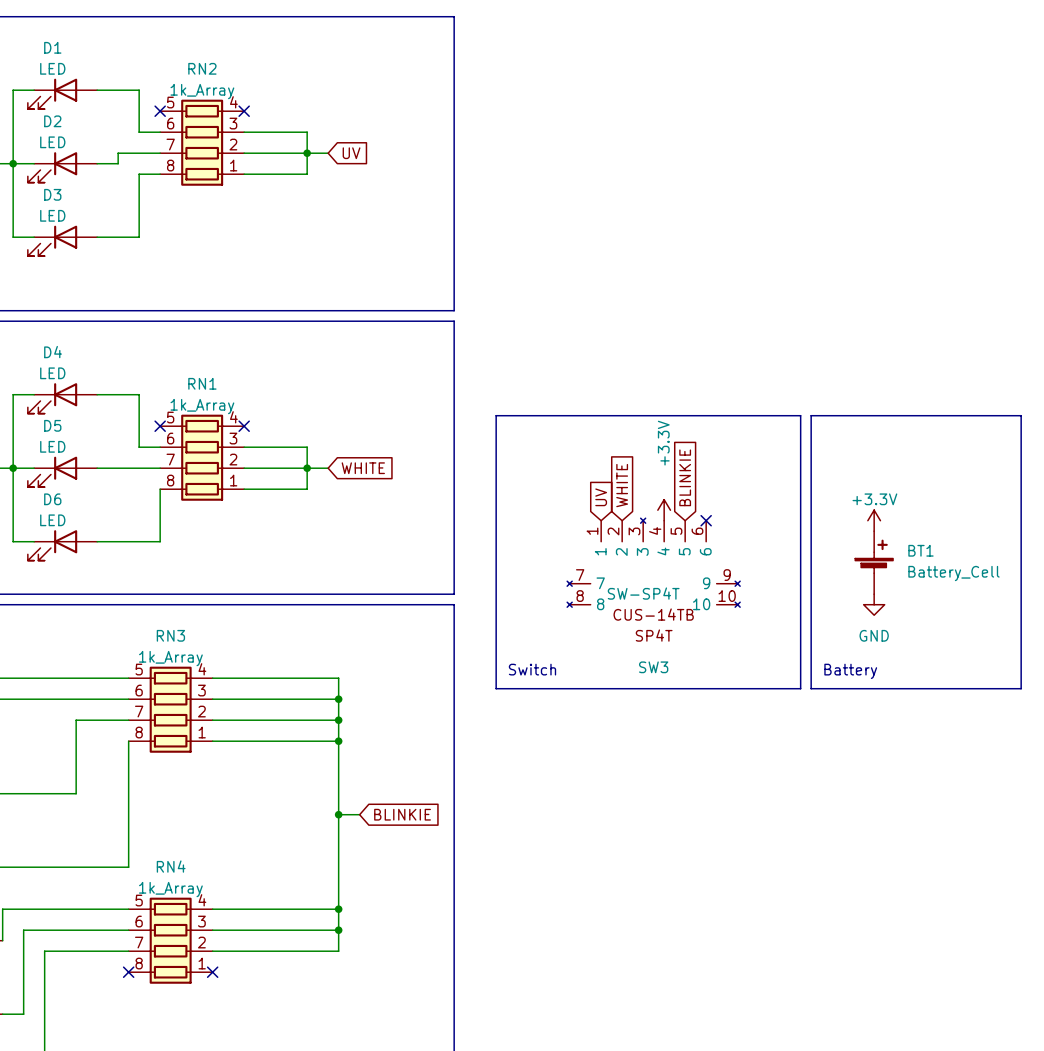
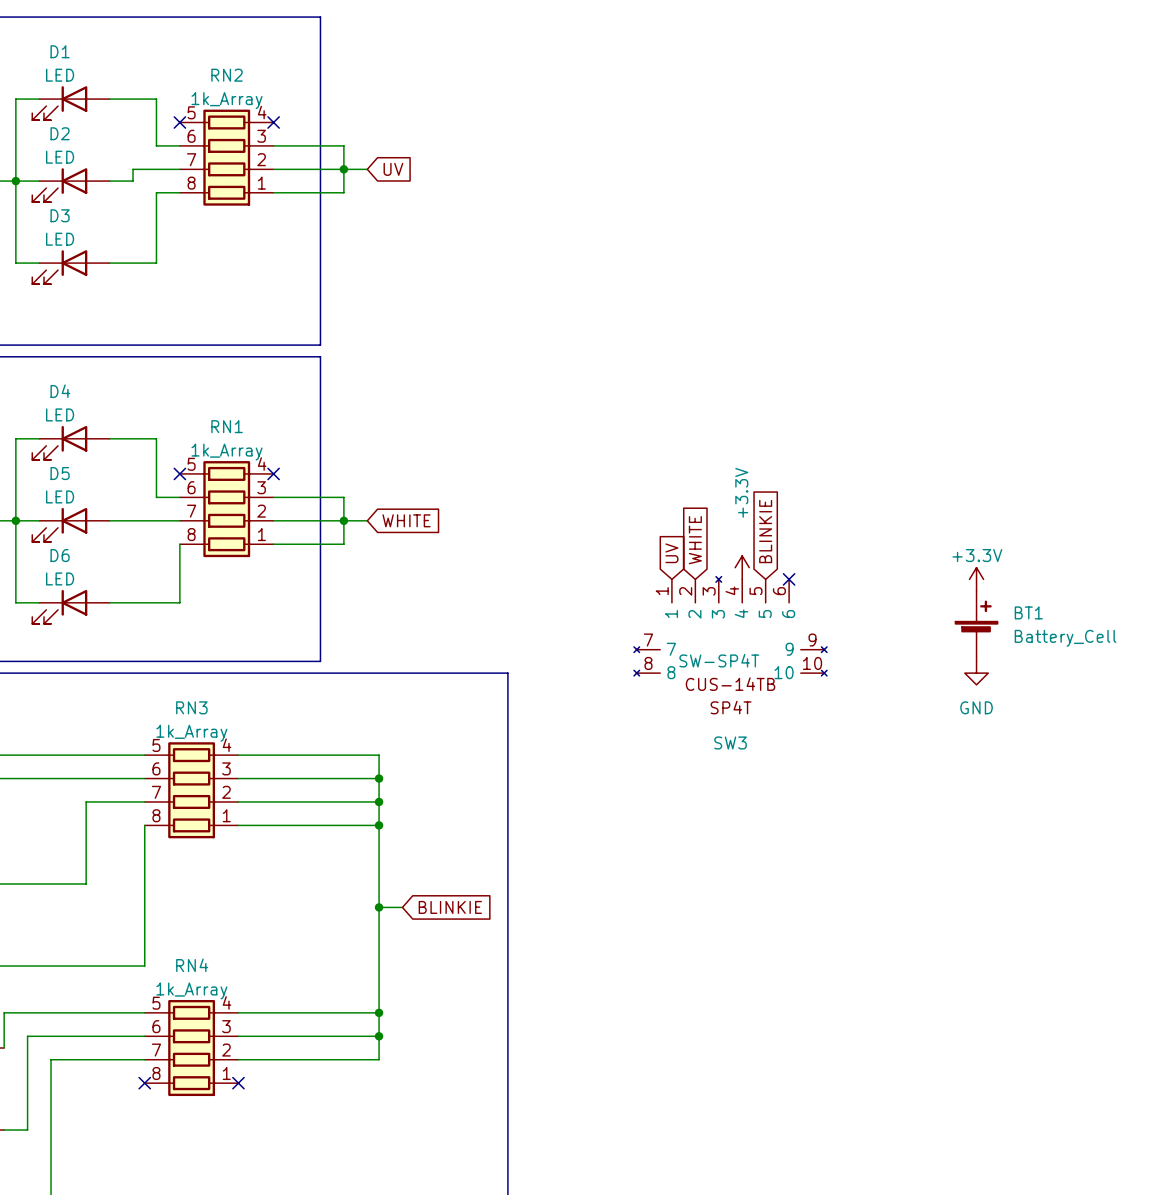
line: (286, 16) (454, 16) (454, 310) (286, 310) -> (320, 17) (320, 345)
line: (286, 321) (454, 321) (454, 594) (286, 594) -> (320, 356) (320, 661)
line: (496, 415) (800, 415) (800, 688) (496, 688) (496, 415) -> none
line: (811, 415) (1021, 415) (1021, 688) (811, 688) (811, 415) -> none
text: Switch (532, 669) -> none
text: Battery (850, 671) -> none

